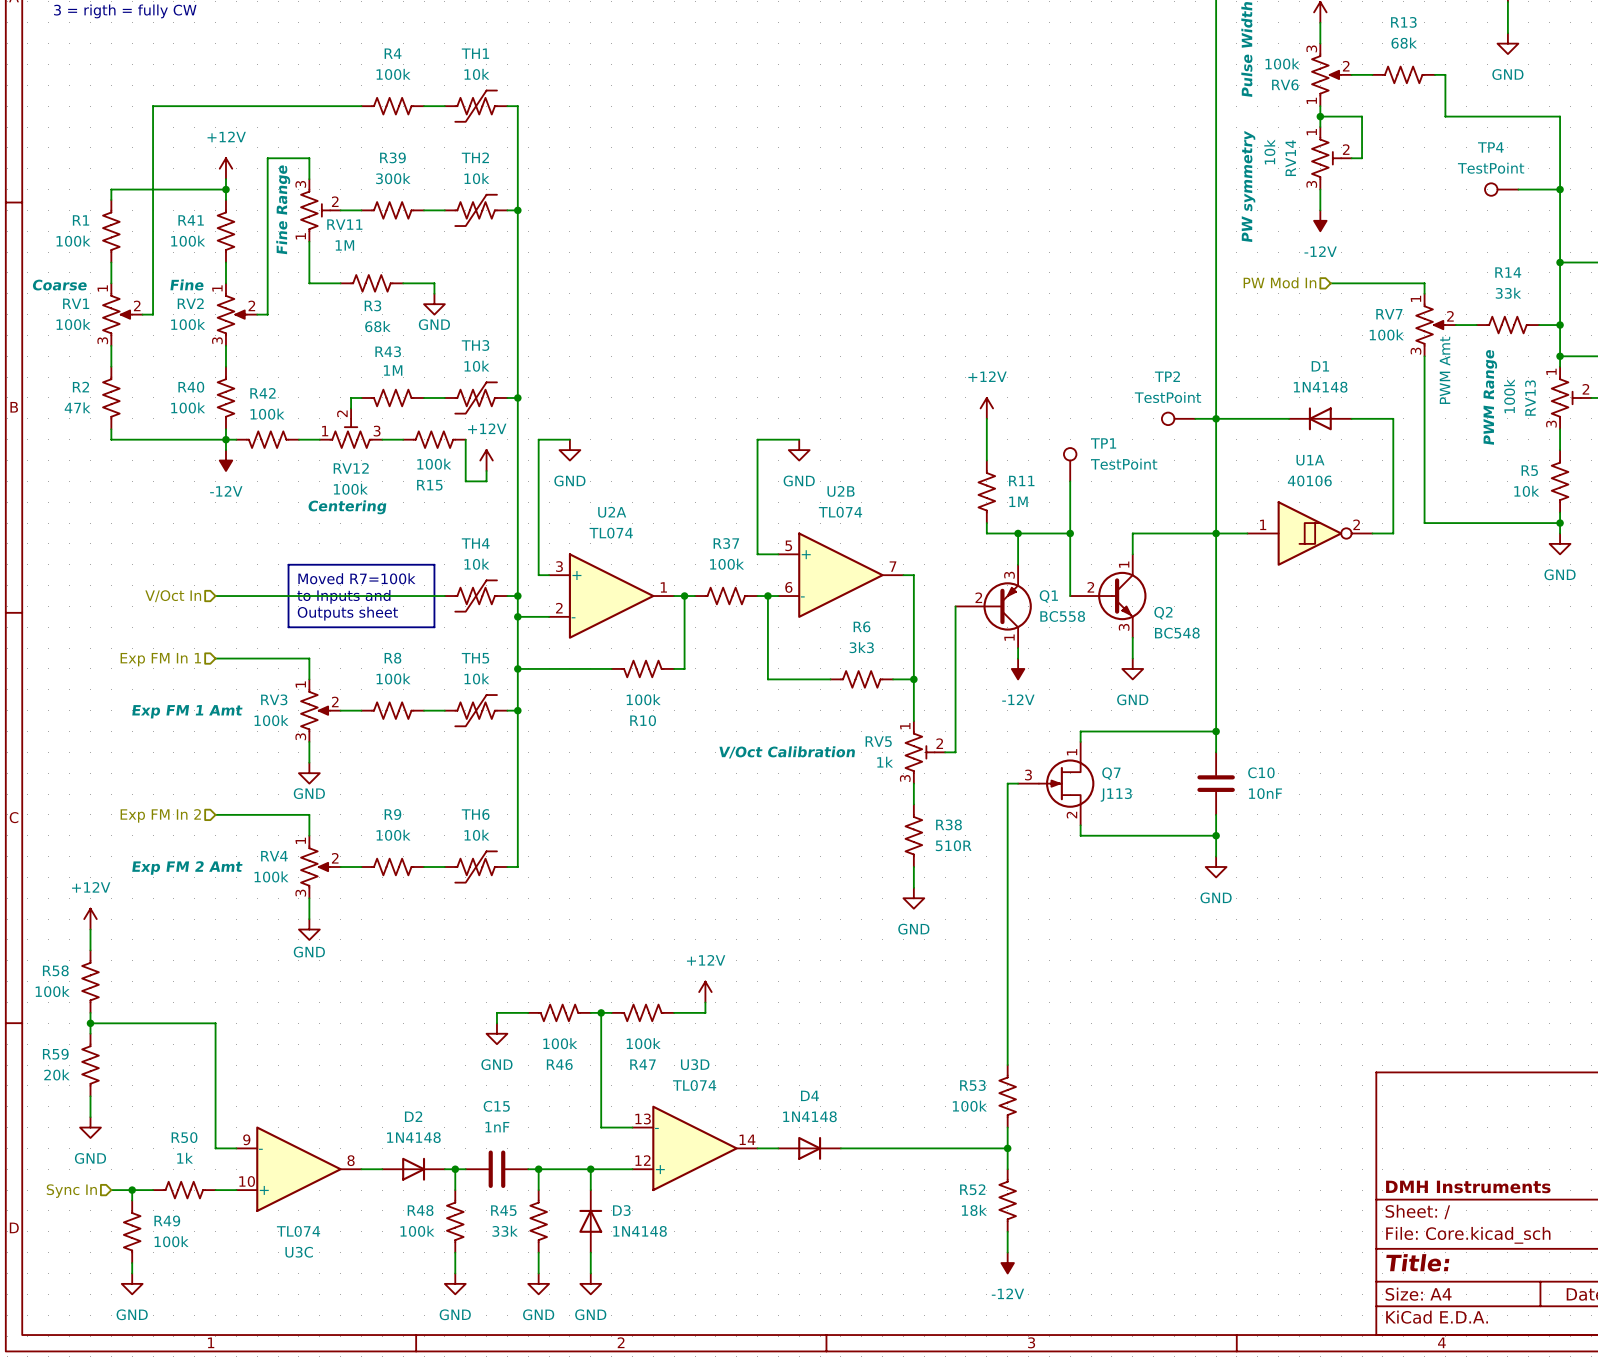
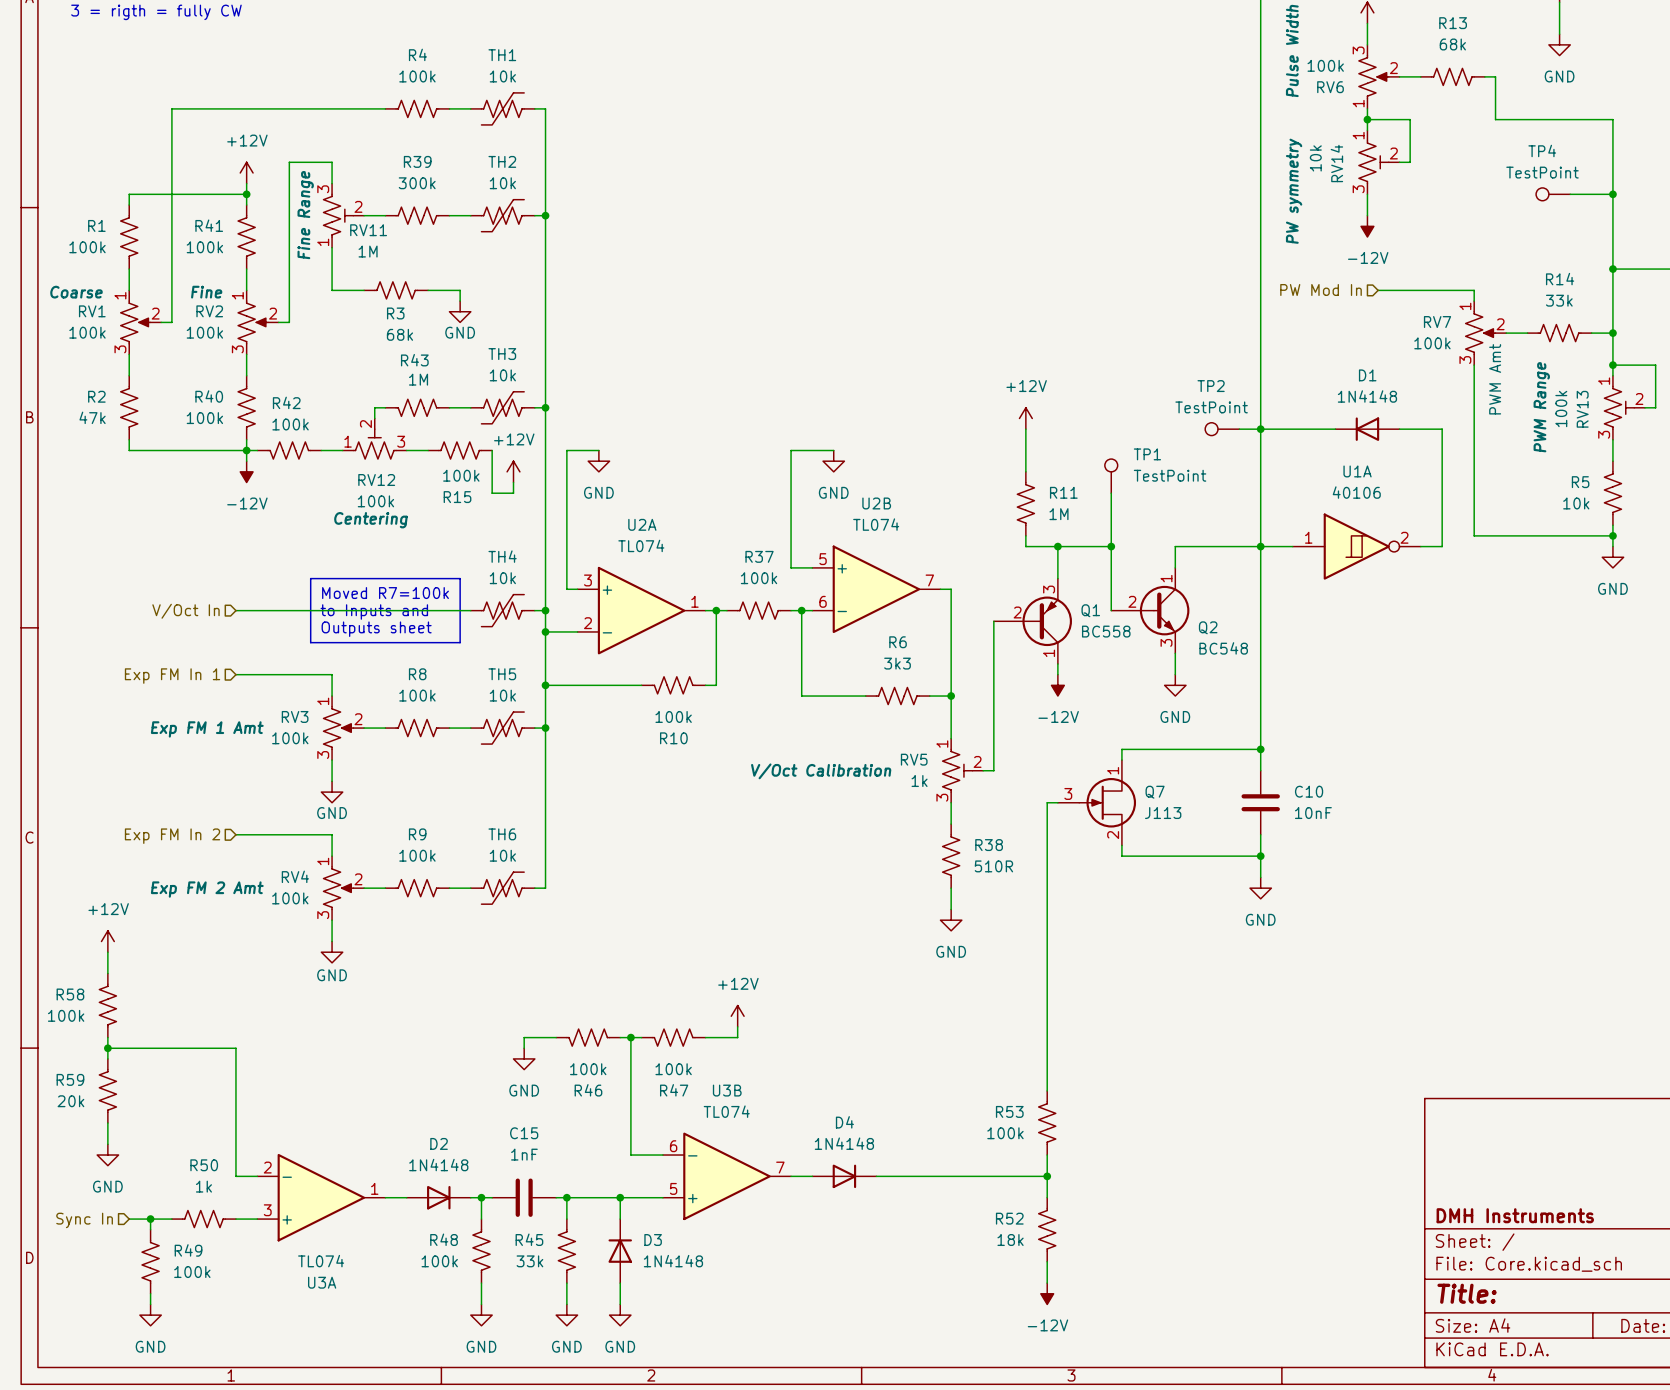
U3D name: U3D (695, 1064) -> U3B (727, 1090)
U3D pin number: 13 (643, 1118) -> 6 (673, 1146)
U3C pin number: 9 (246, 1139) -> 2 (267, 1167)
U3D pin number: 14 (747, 1139) -> 7 (780, 1167)
U3C pin number: 8 (351, 1160) -> 1 (374, 1188)
U3D pin number: 12 (642, 1160) -> 5 (673, 1188)
U3C pin number: 10 (247, 1181) -> 3 (267, 1210)
U3C name: U3C (299, 1252) -> U3A (322, 1282)

